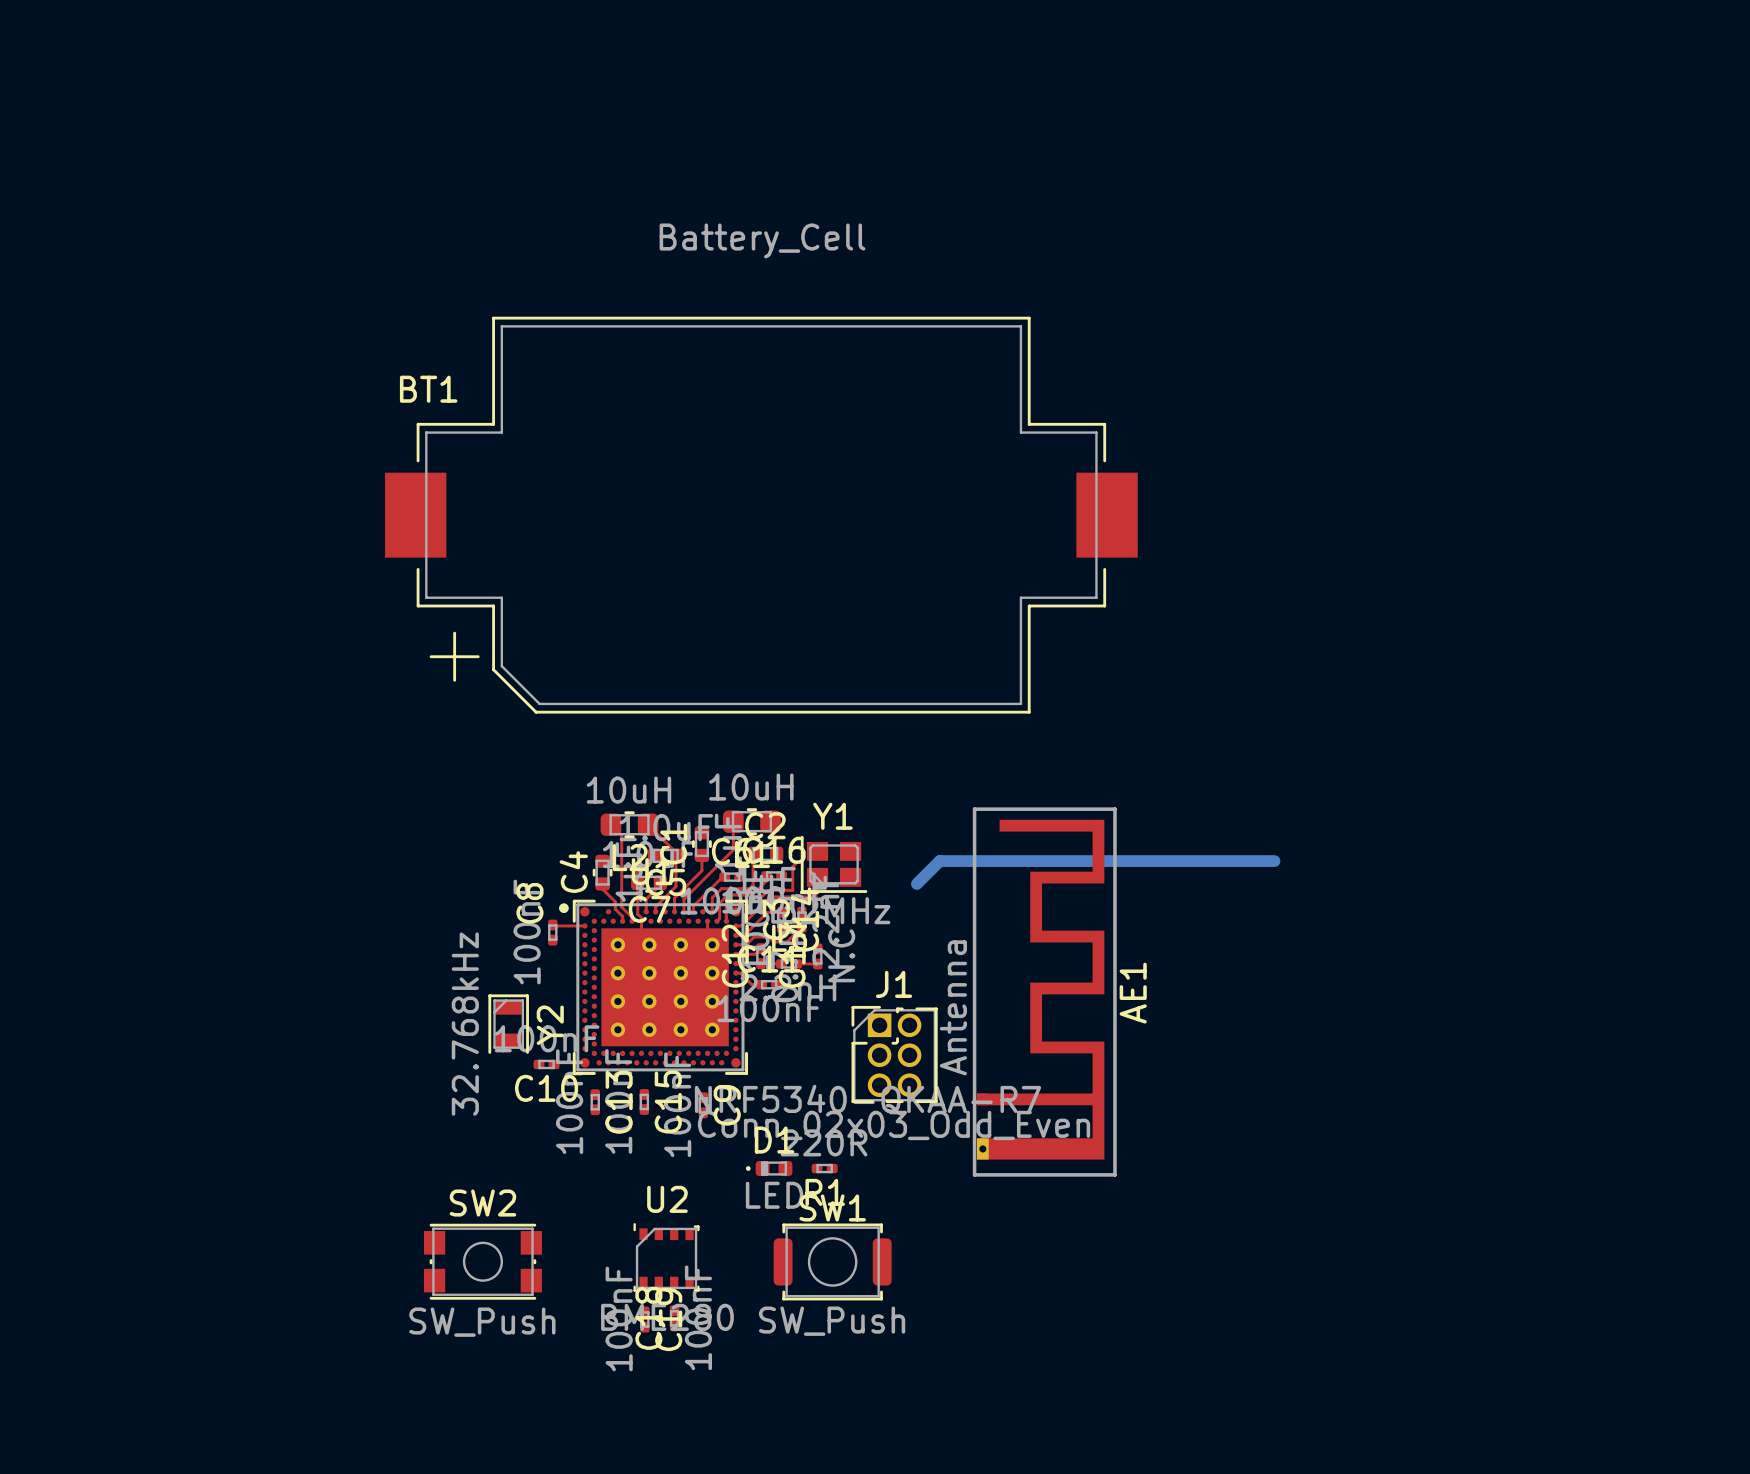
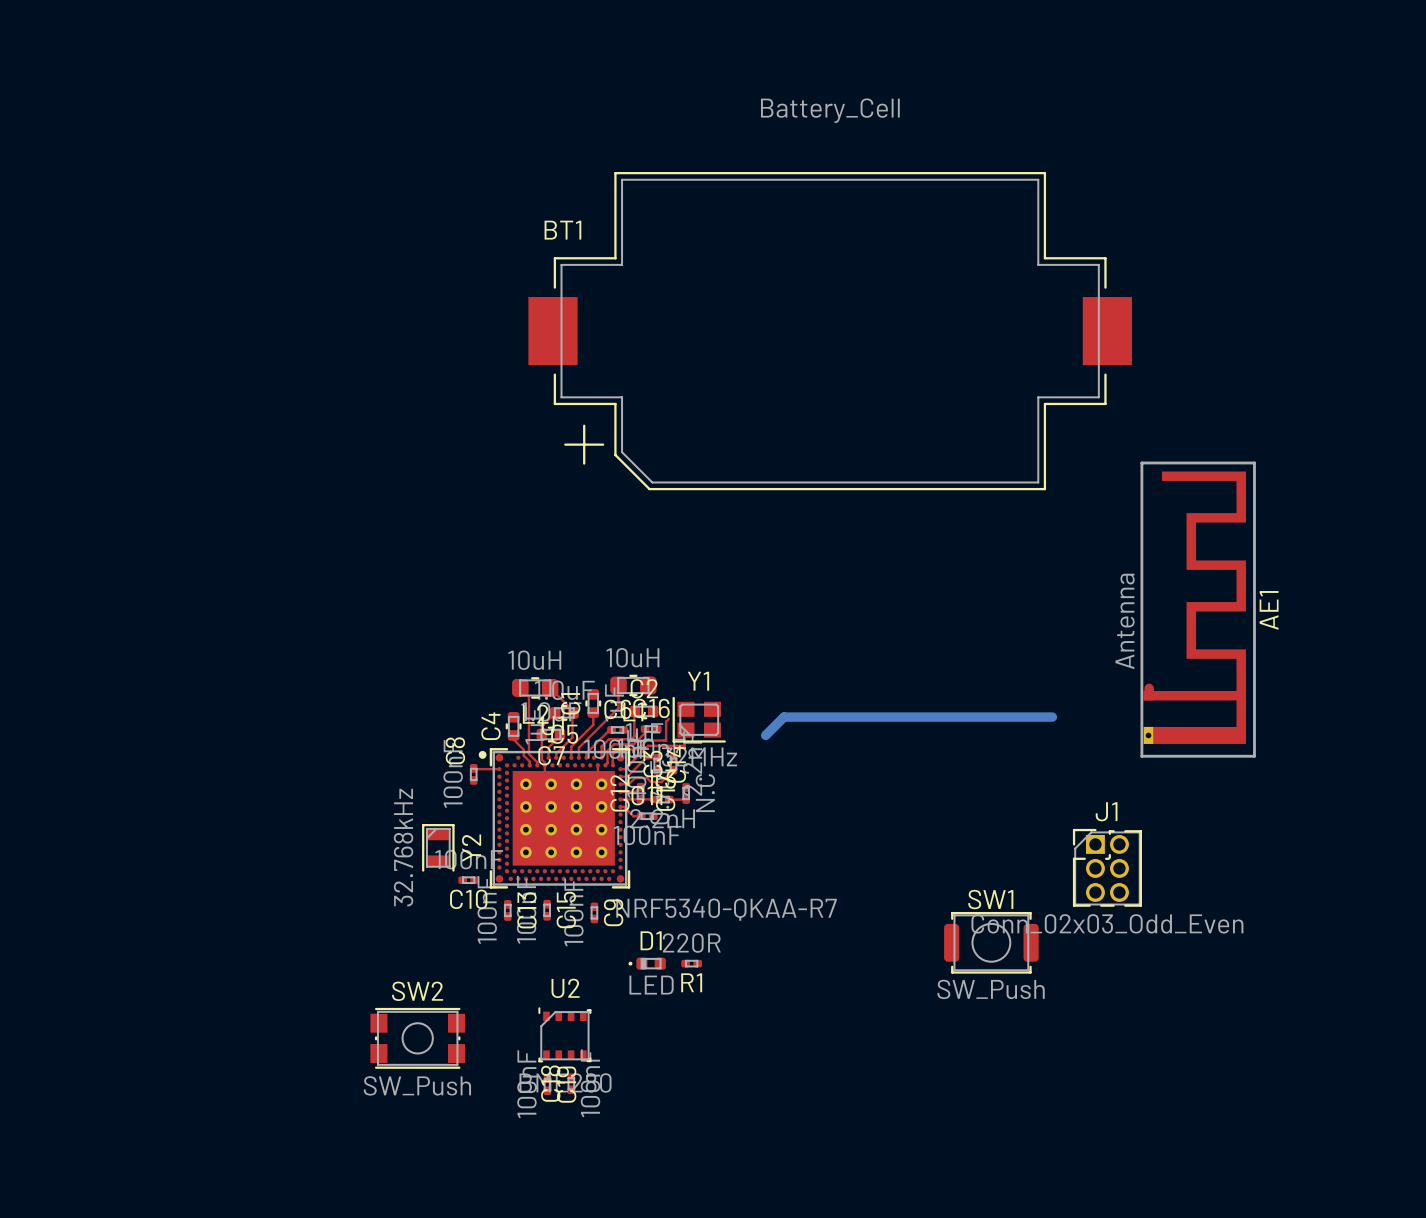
BT1 position: (761, 515) -> (830, 331)
top track: none -> (1149, 688) (1149, 695)
AE1 position: (1044, 992) -> (1198, 609)
J1 position: (894, 1054) -> (1107, 867)
SW1 position: (832, 1261) -> (991, 942)

